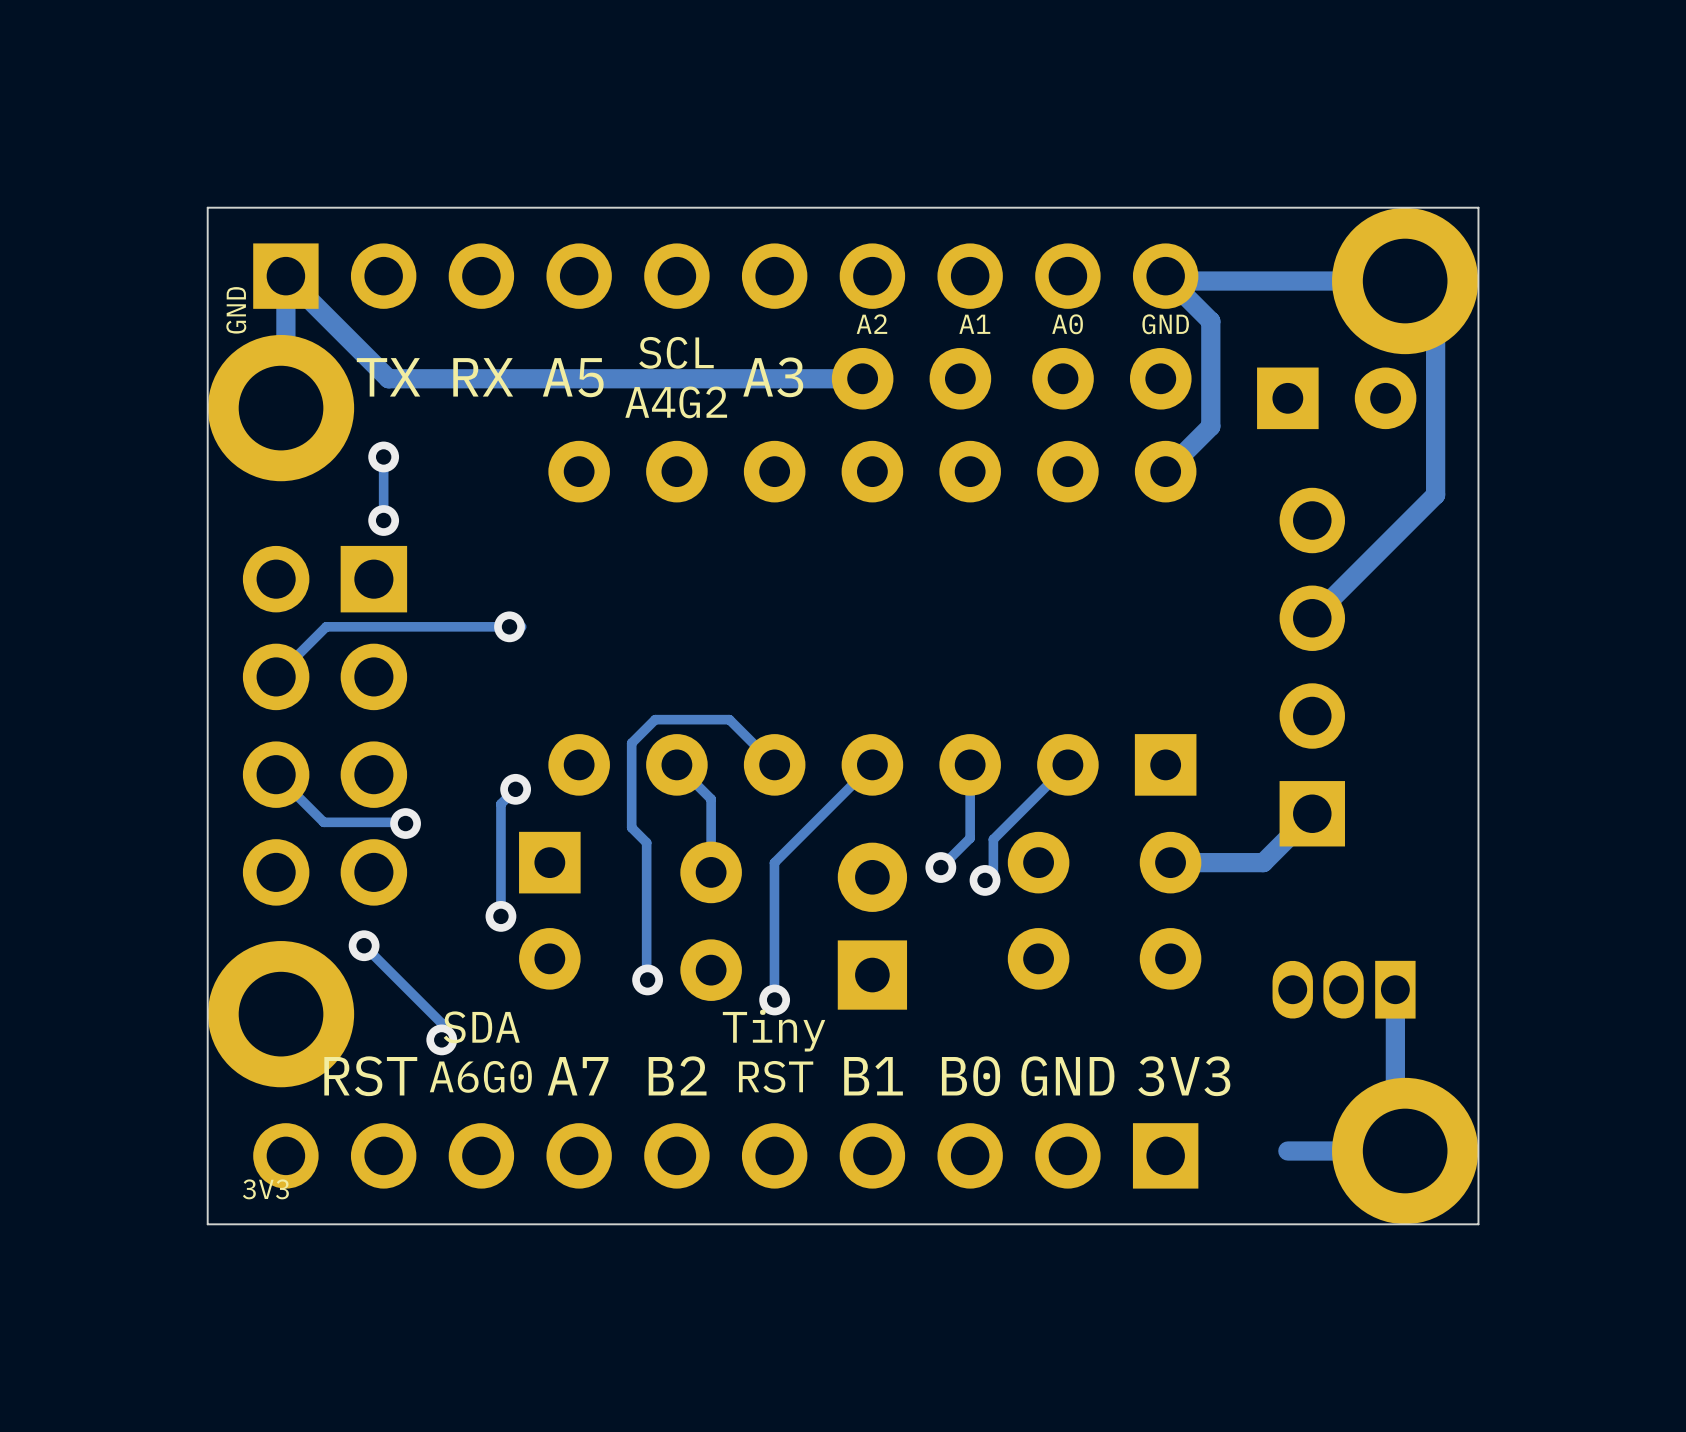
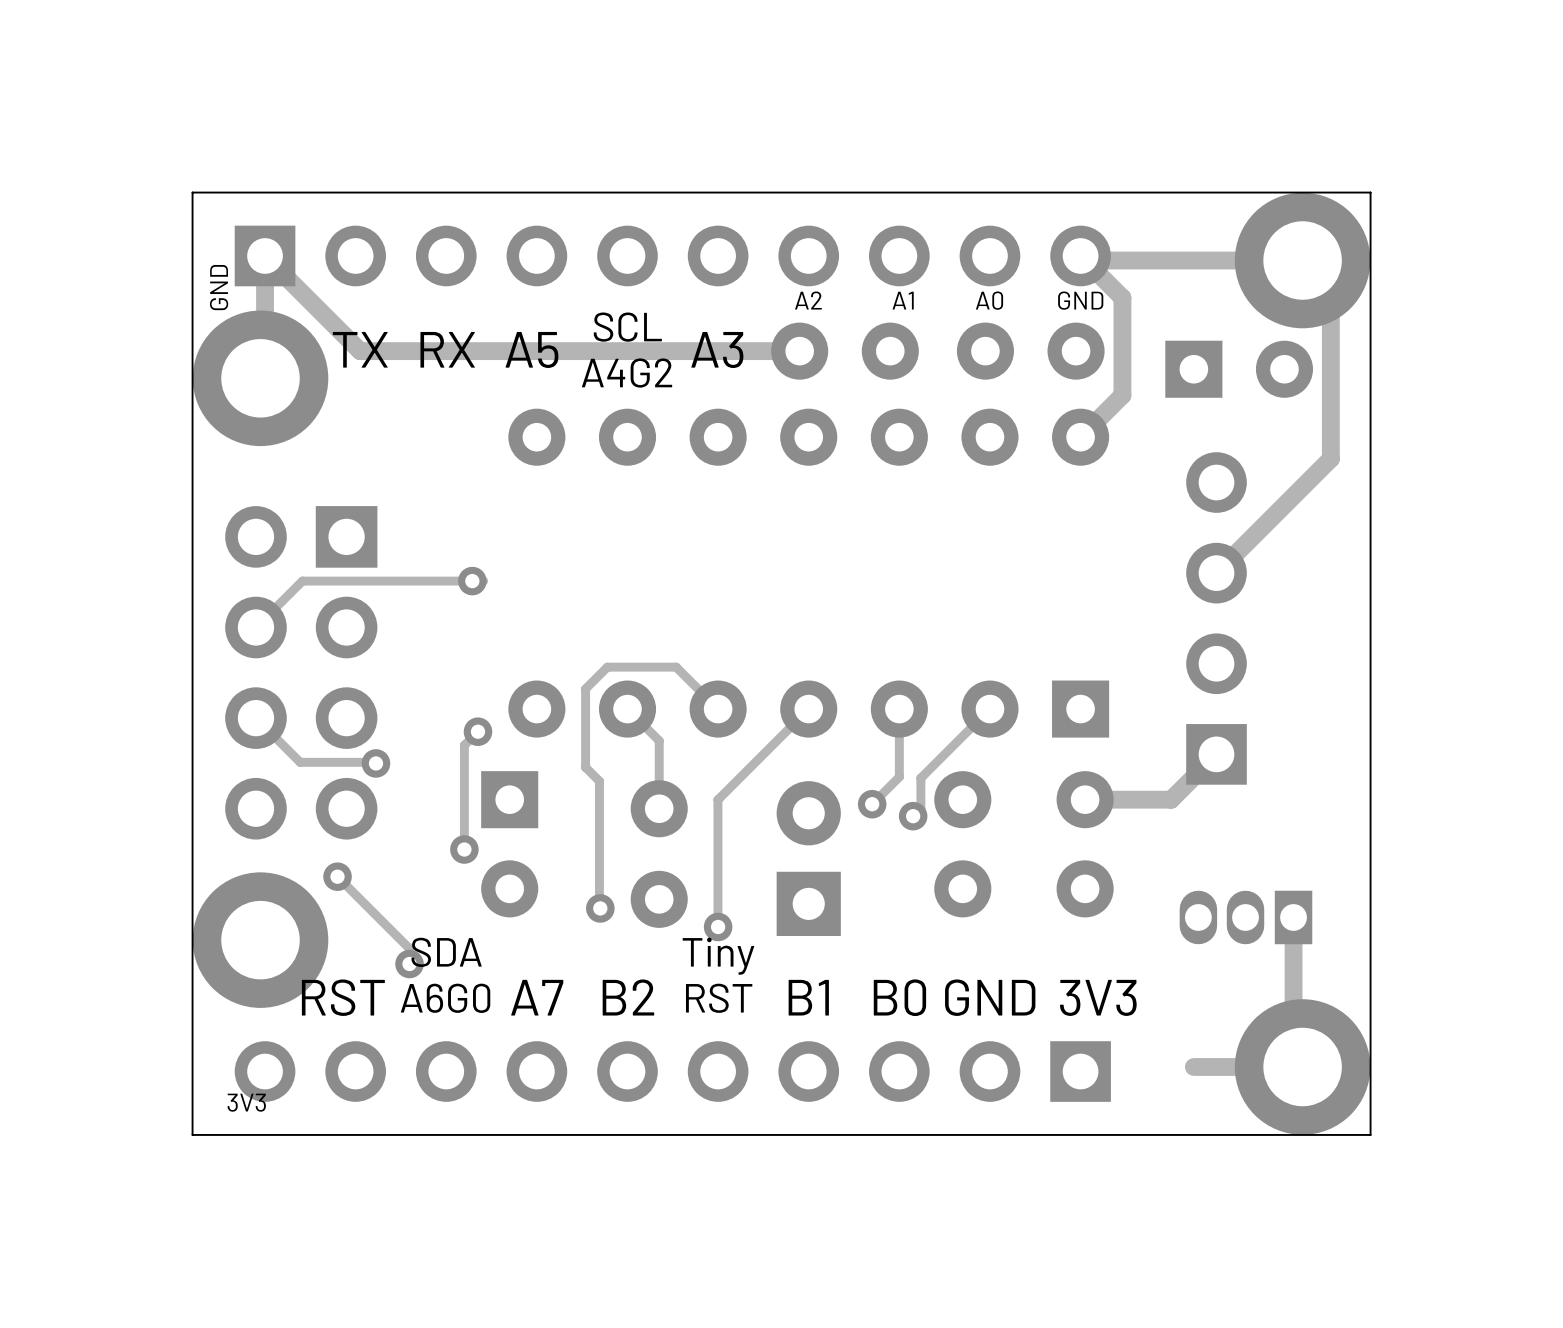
track: (383, 456) (383, 520) -> none
via: (383, 456) -> none
via: (383, 520) -> none

